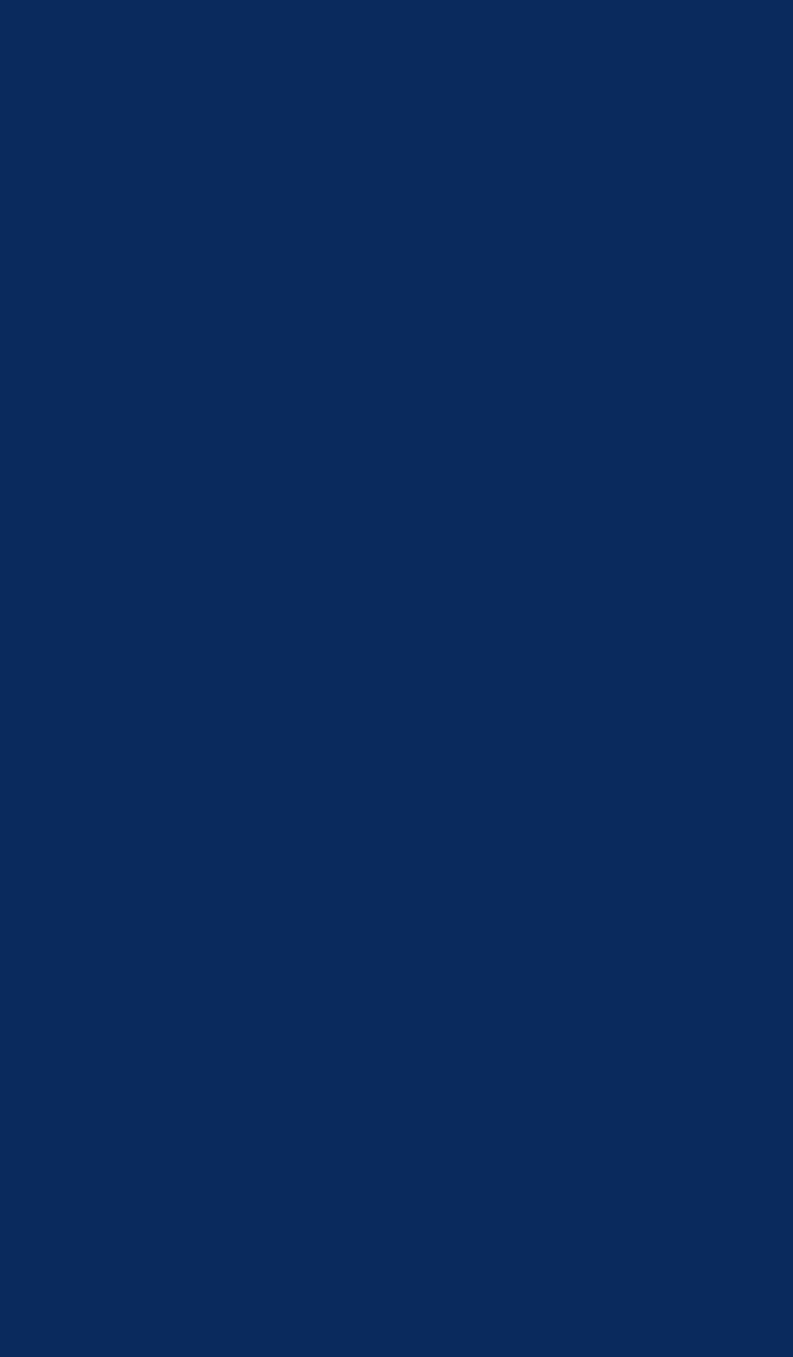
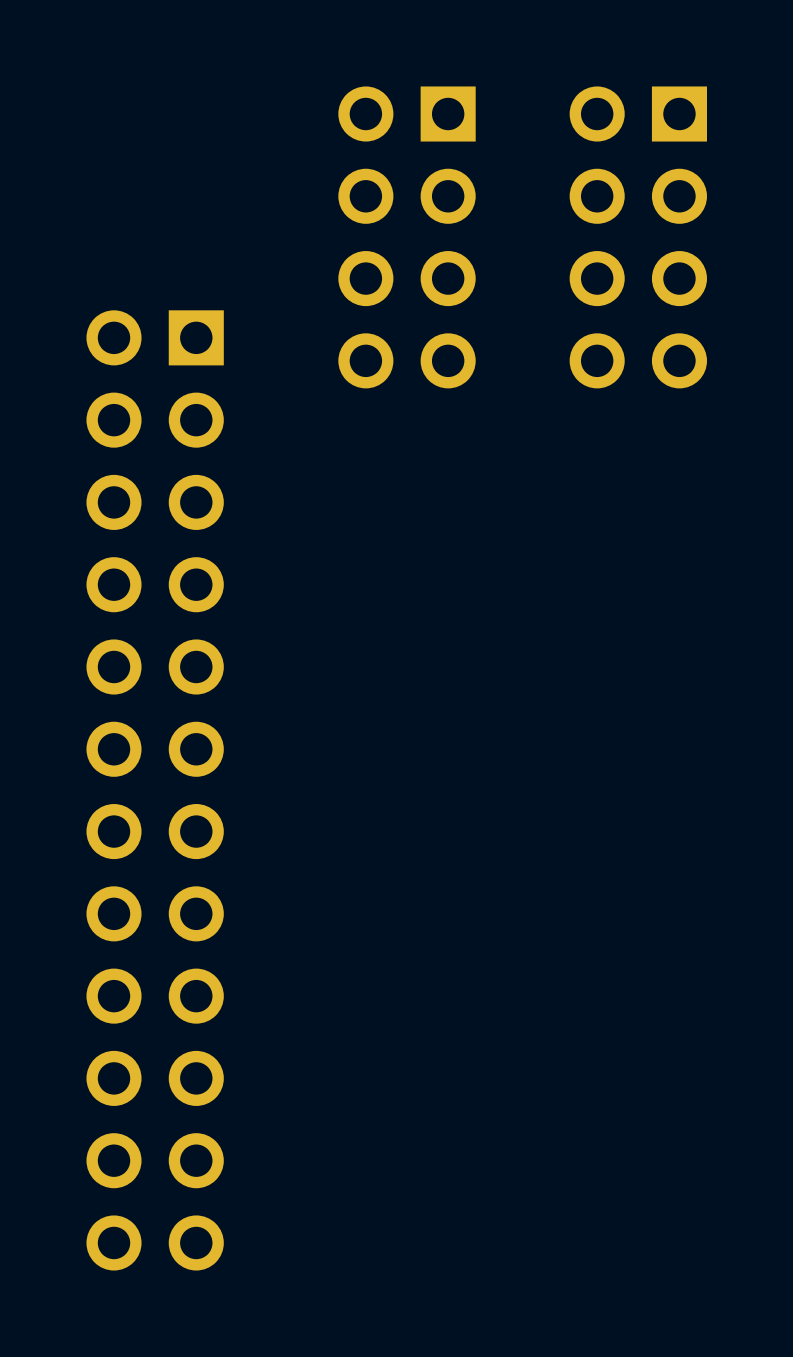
part: none -> (407, 237)
part: none -> (638, 237)
part: none -> (155, 790)

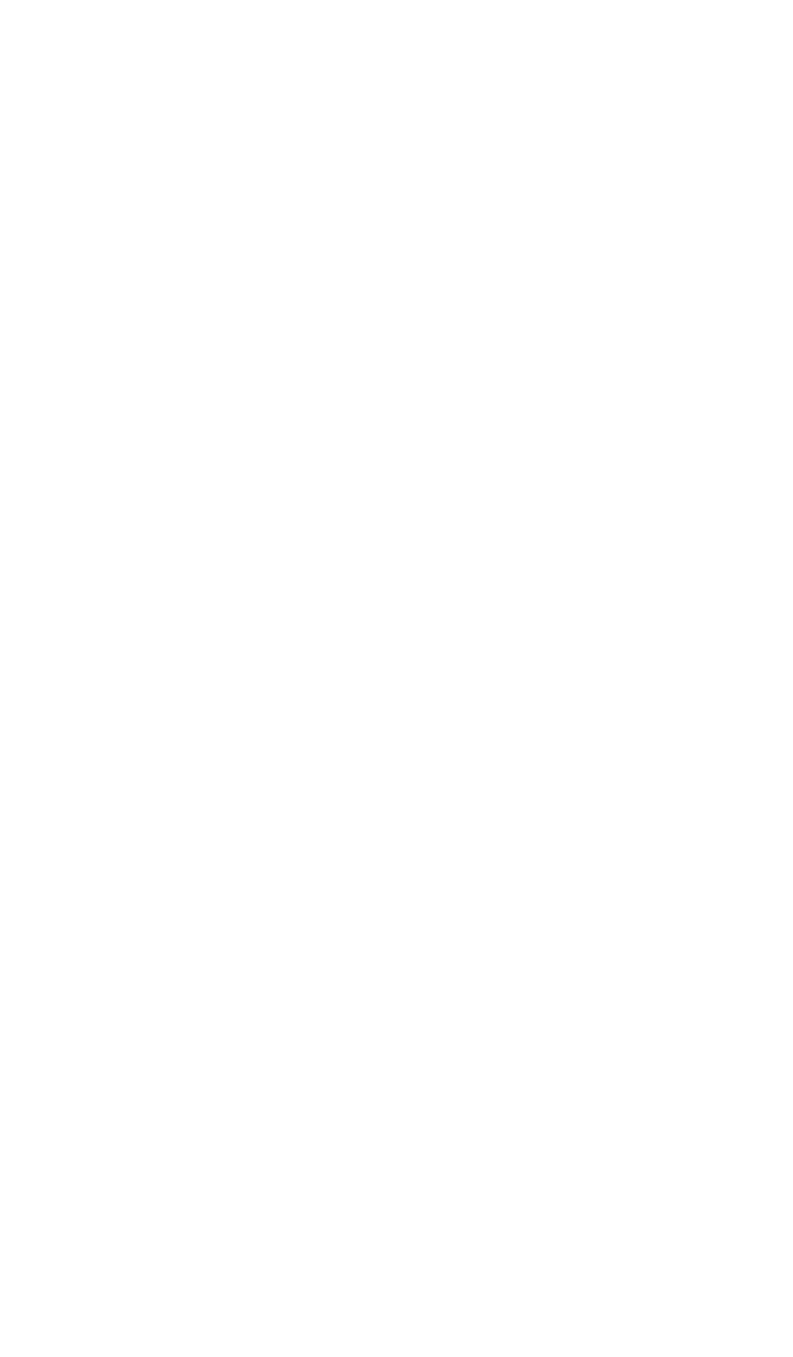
part: (407, 237) -> none
part: (638, 237) -> none
part: (155, 790) -> none

